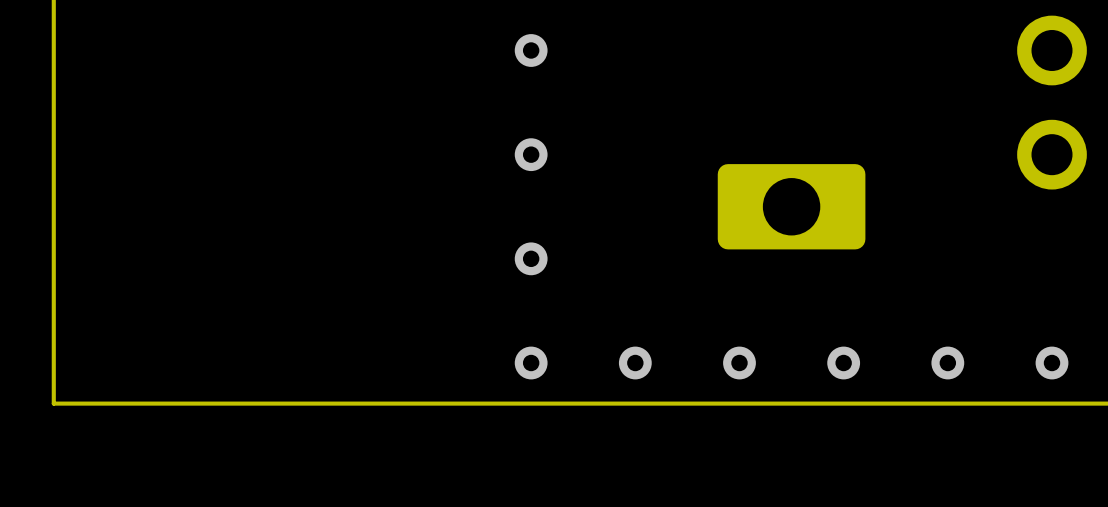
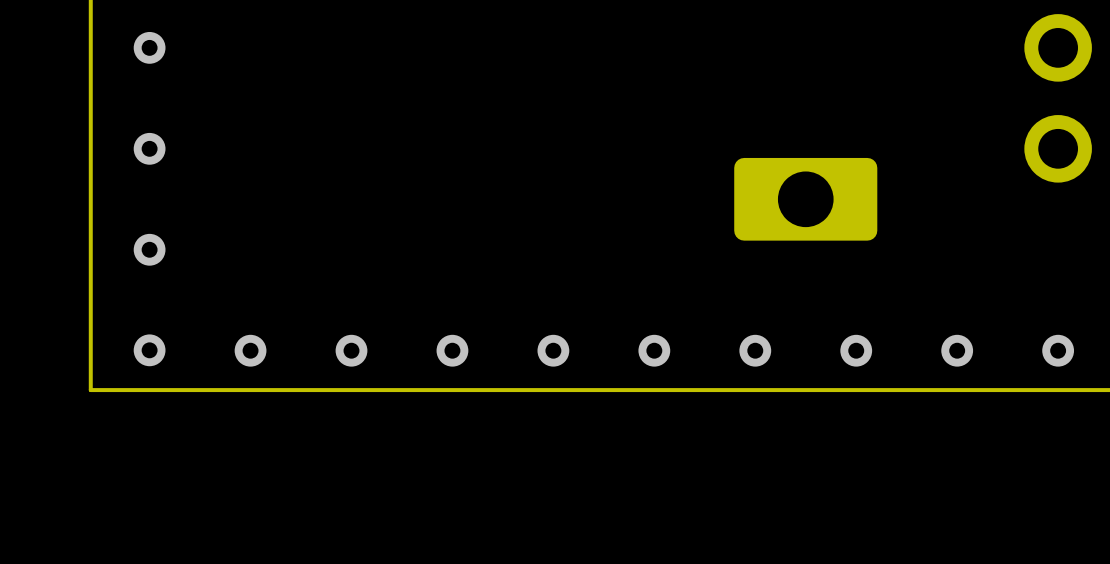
via: none -> (149, 47)
via: (531, 50) -> none
via: none -> (149, 148)
via: (531, 154) -> none
via: none -> (149, 249)
via: (531, 258) -> none
via: none -> (149, 350)
via: none -> (250, 350)
via: none -> (351, 350)
via: none -> (452, 350)

